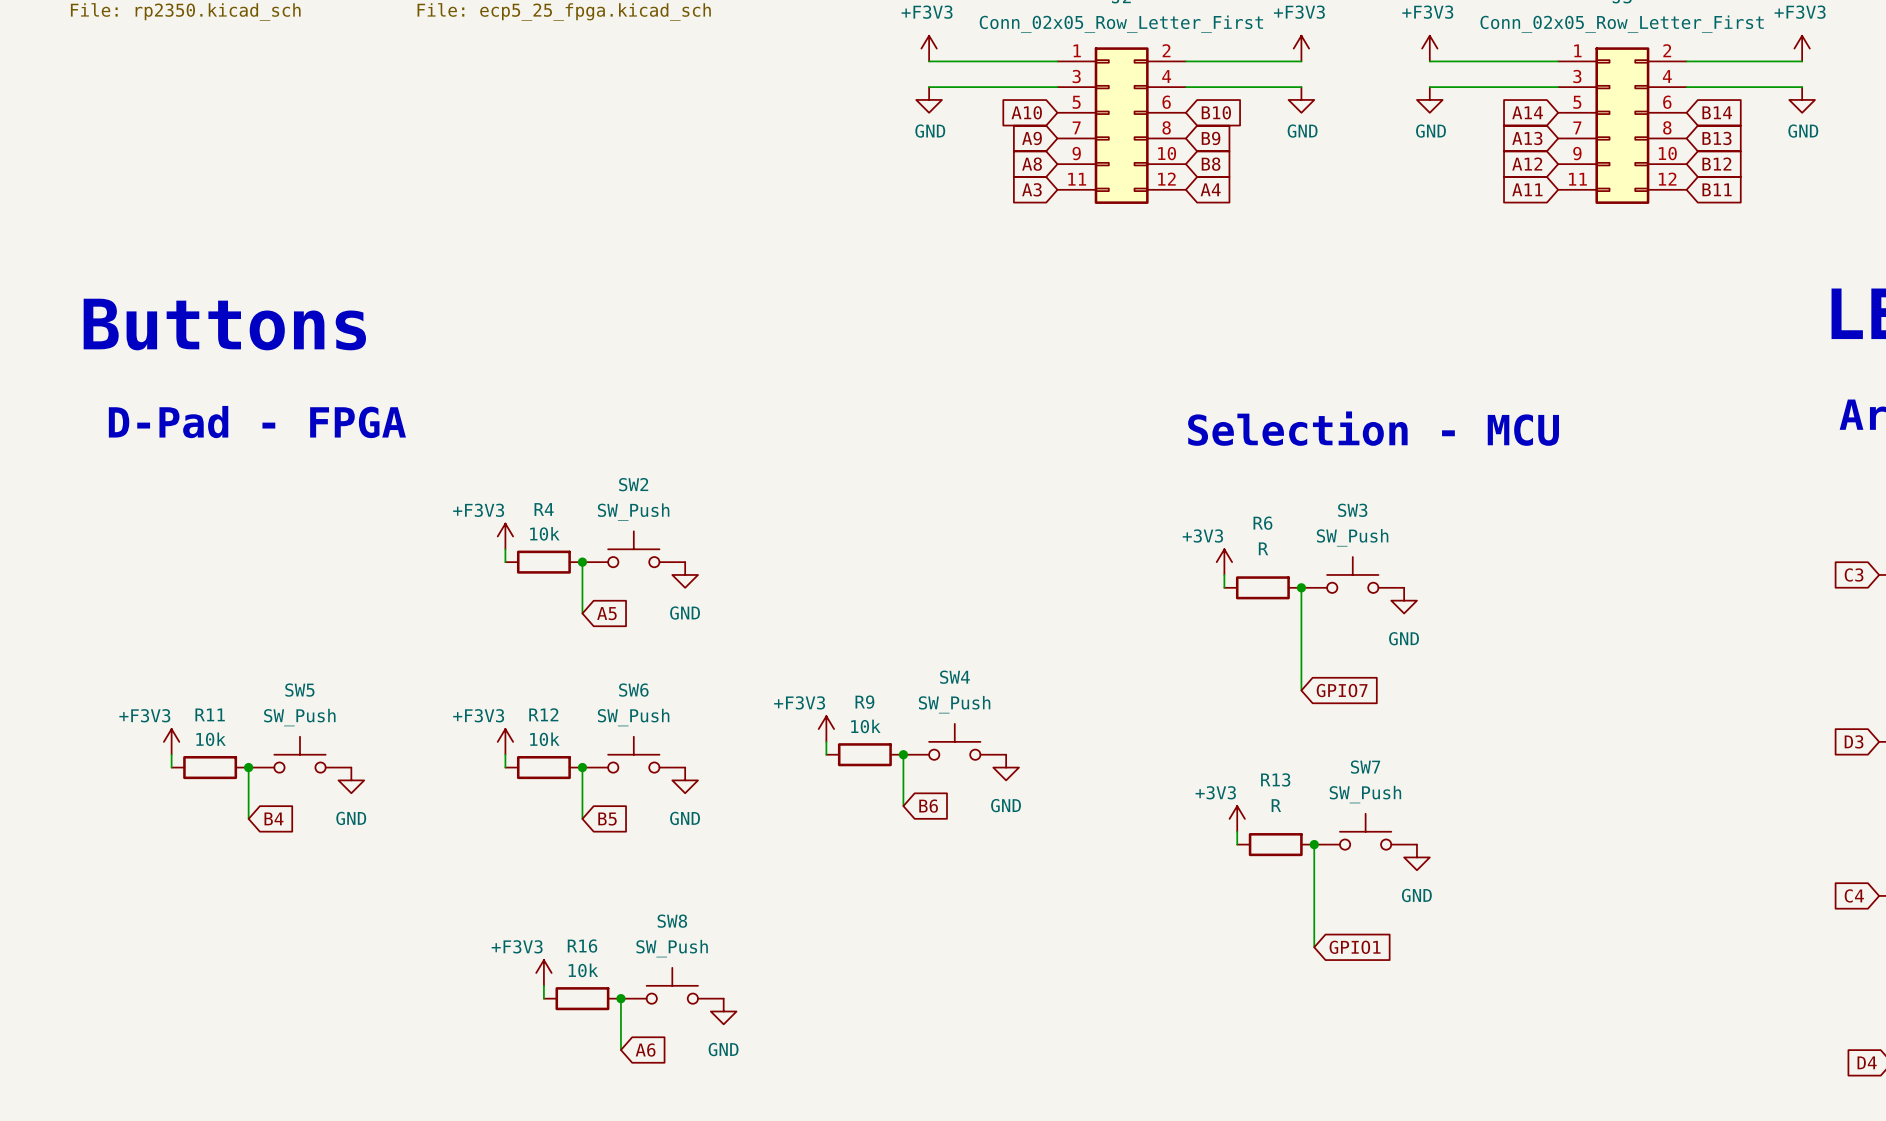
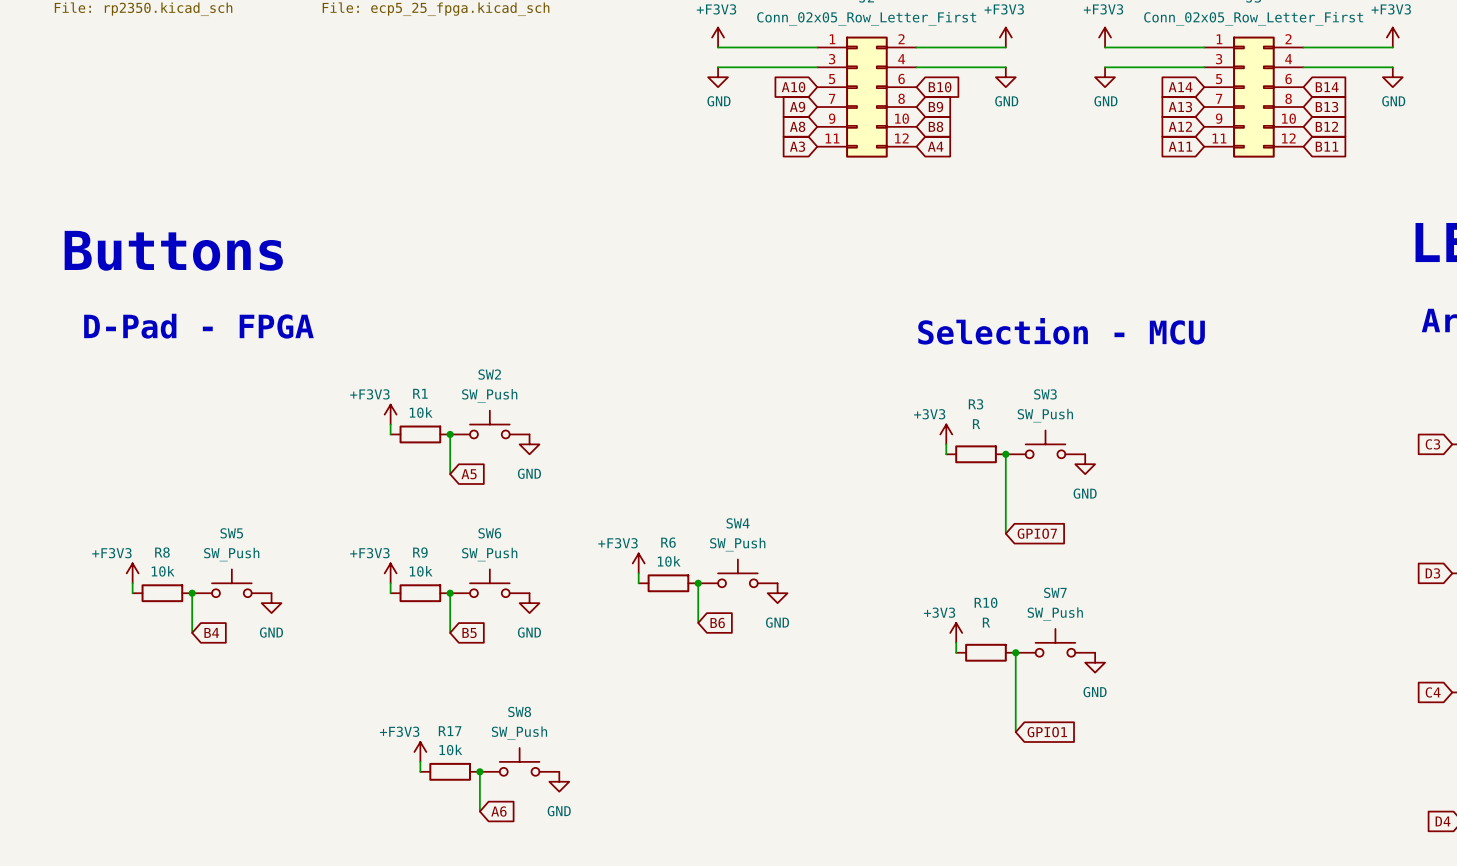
R4 name: R4 (544, 509) -> R1 (420, 393)
R6 name: R6 (1262, 523) -> R3 (976, 404)
R9 name: R9 (864, 702) -> R6 (668, 542)
R11 name: R11 (210, 714) -> R8 (162, 552)
R12 name: R12 (543, 714) -> R9 (420, 552)
R13 name: R13 (1275, 779) -> R10 (986, 602)
R16 name: R16 (582, 946) -> R17 (450, 731)

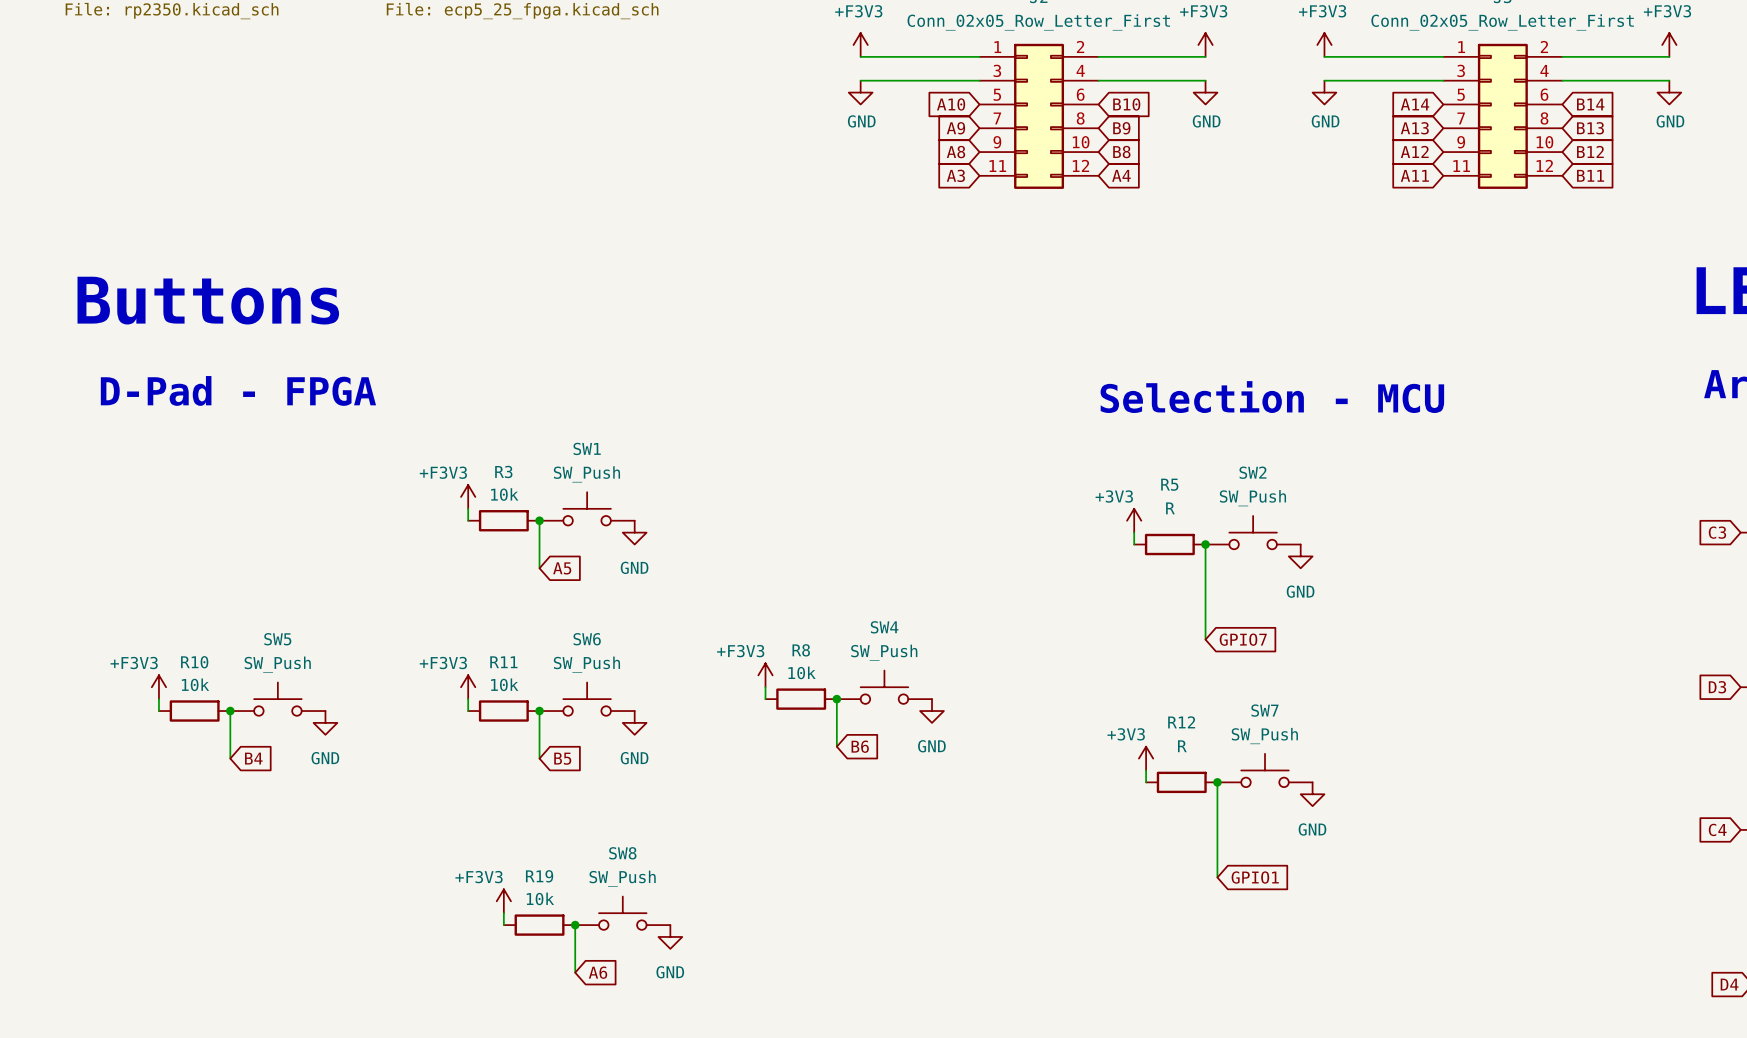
SW2 name: SW2 (489, 374) -> SW1 (587, 448)
R1 name: R1 (420, 393) -> R3 (503, 471)
SW3 name: SW3 (1045, 394) -> SW2 (1252, 472)
R3 name: R3 (976, 404) -> R5 (1169, 484)
R6 name: R6 (668, 542) -> R8 (801, 650)
R8 name: R8 (162, 552) -> R10 (194, 662)
R9 name: R9 (420, 552) -> R11 (503, 662)
R10 name: R10 (986, 602) -> R12 (1181, 722)
R17 name: R17 (450, 731) -> R19 (539, 876)

